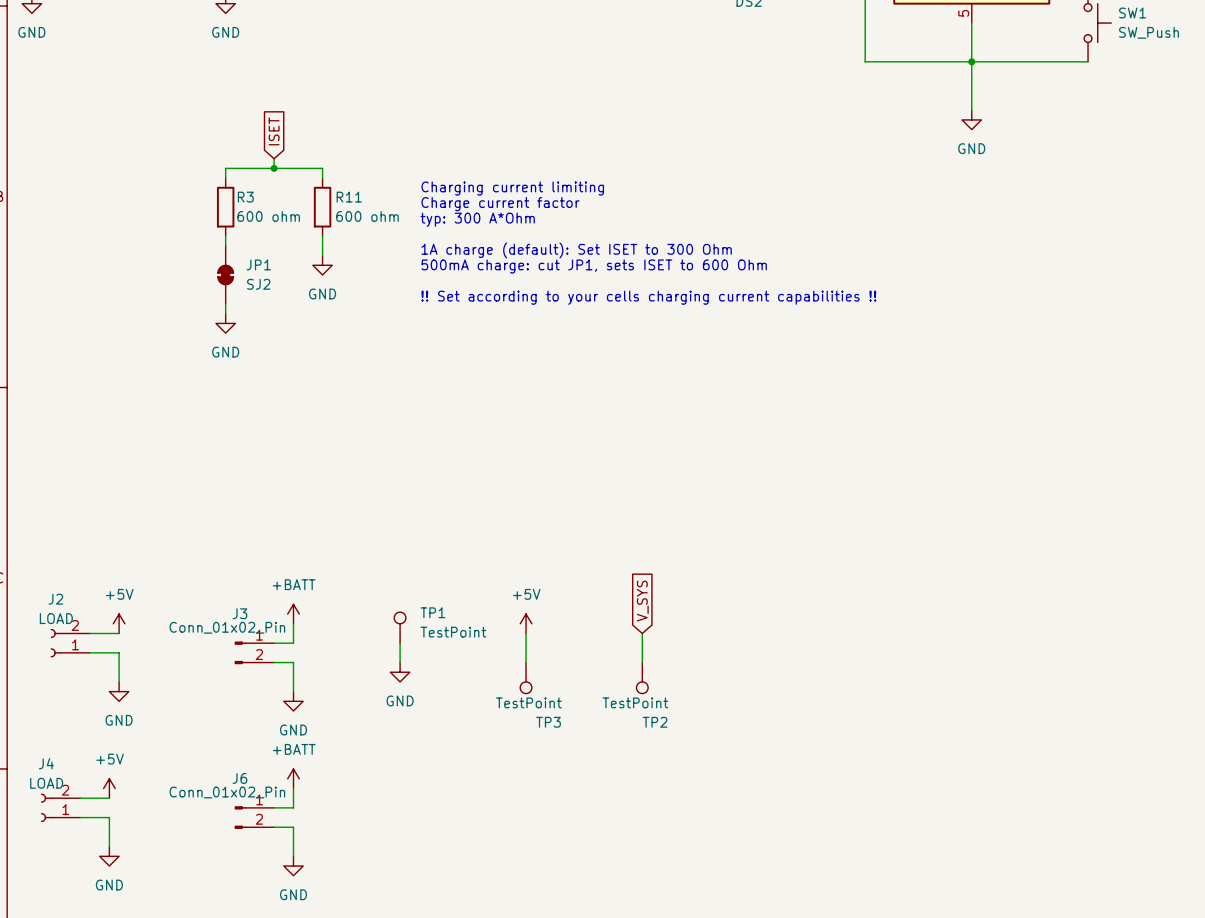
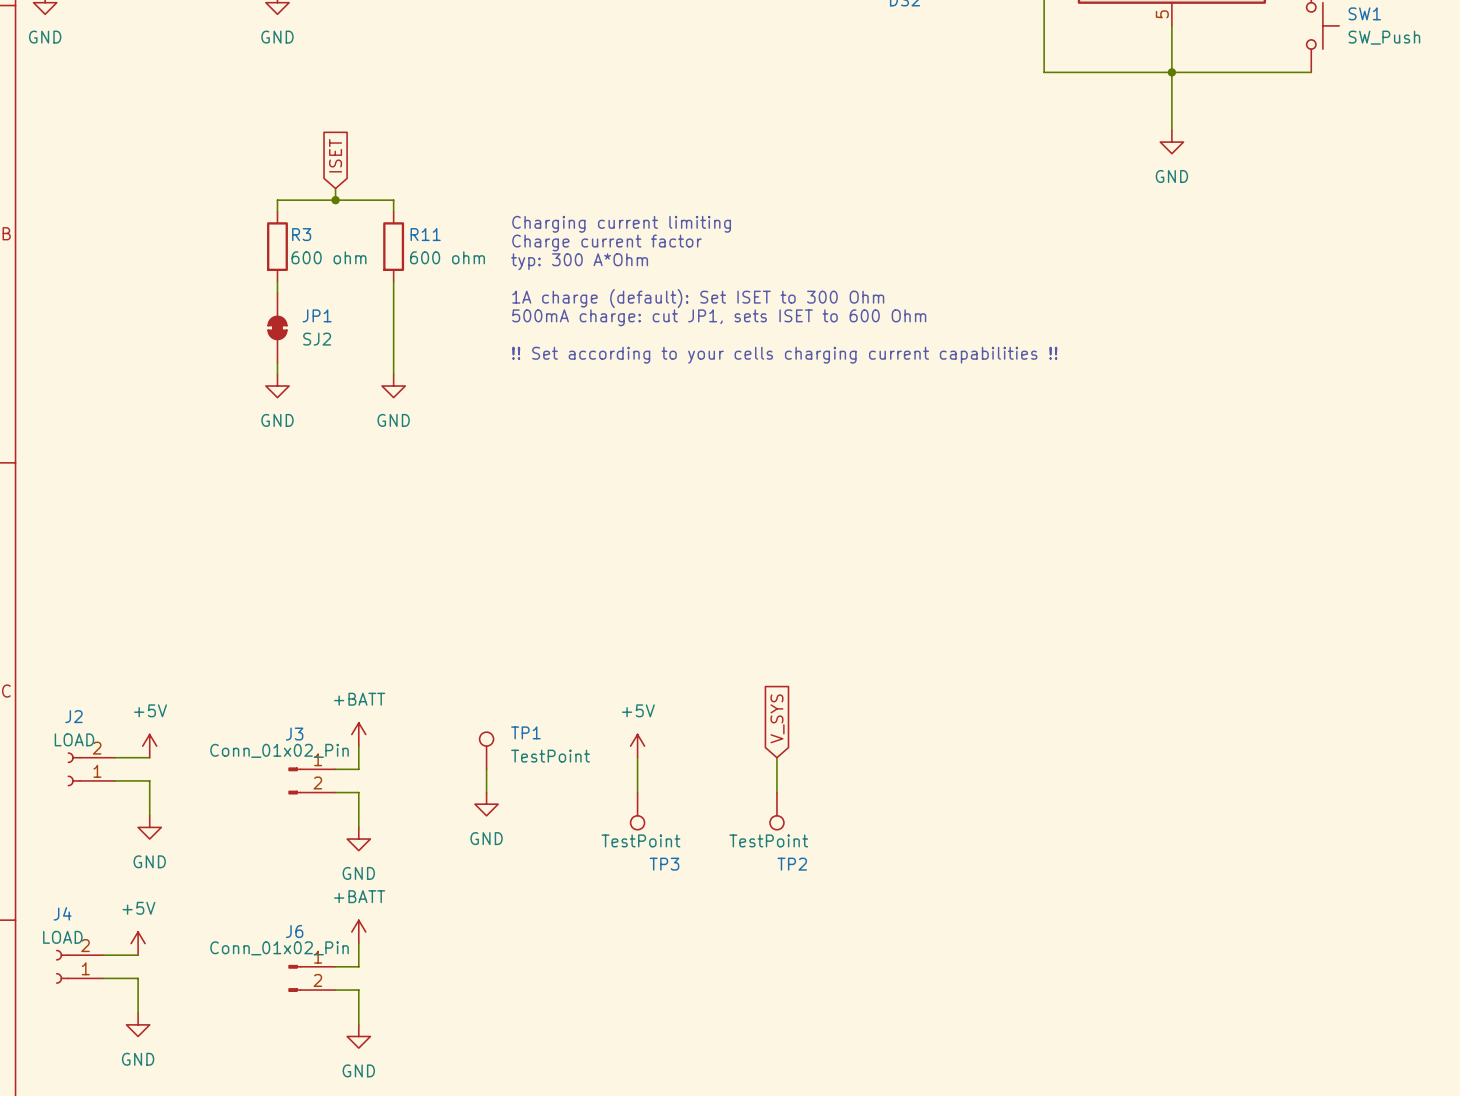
wire: none -> (393, 304) (393, 374)
power symbol position: GND (322, 265) -> GND (393, 386)

